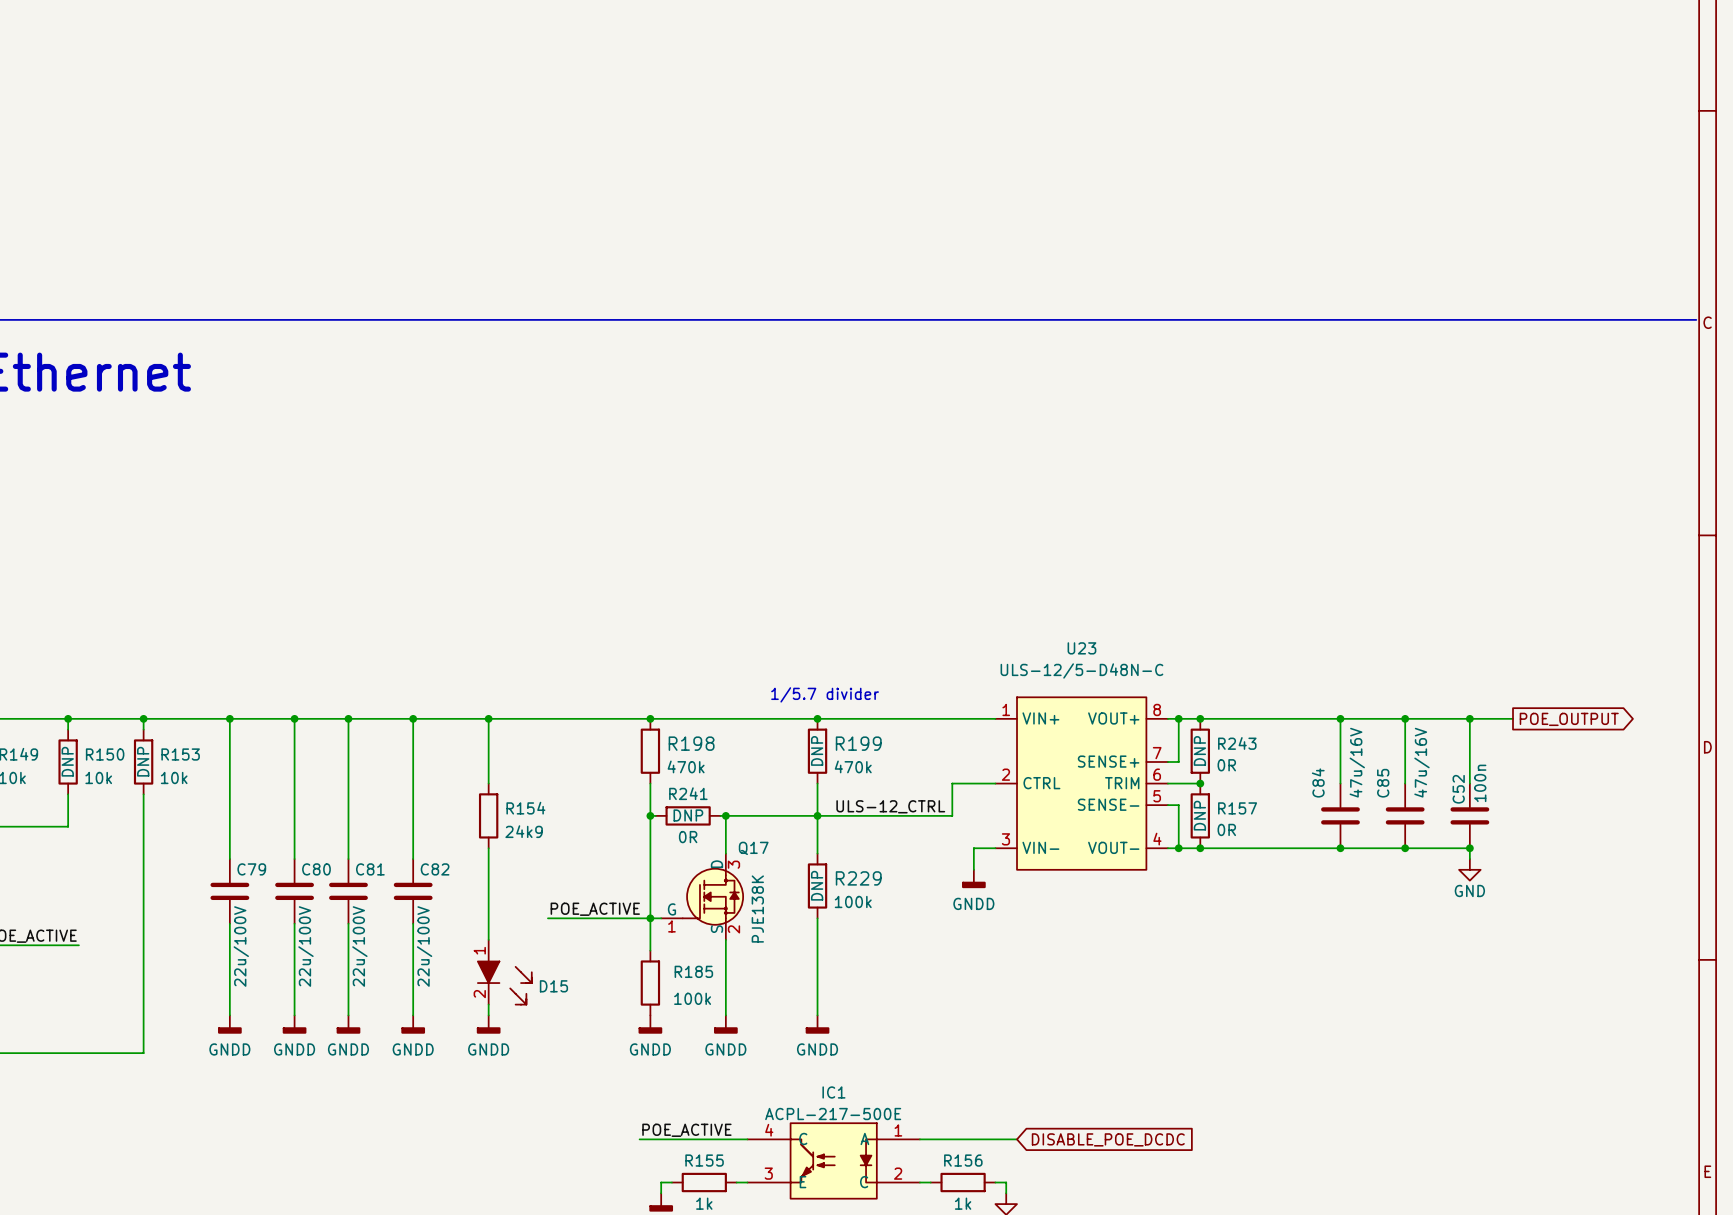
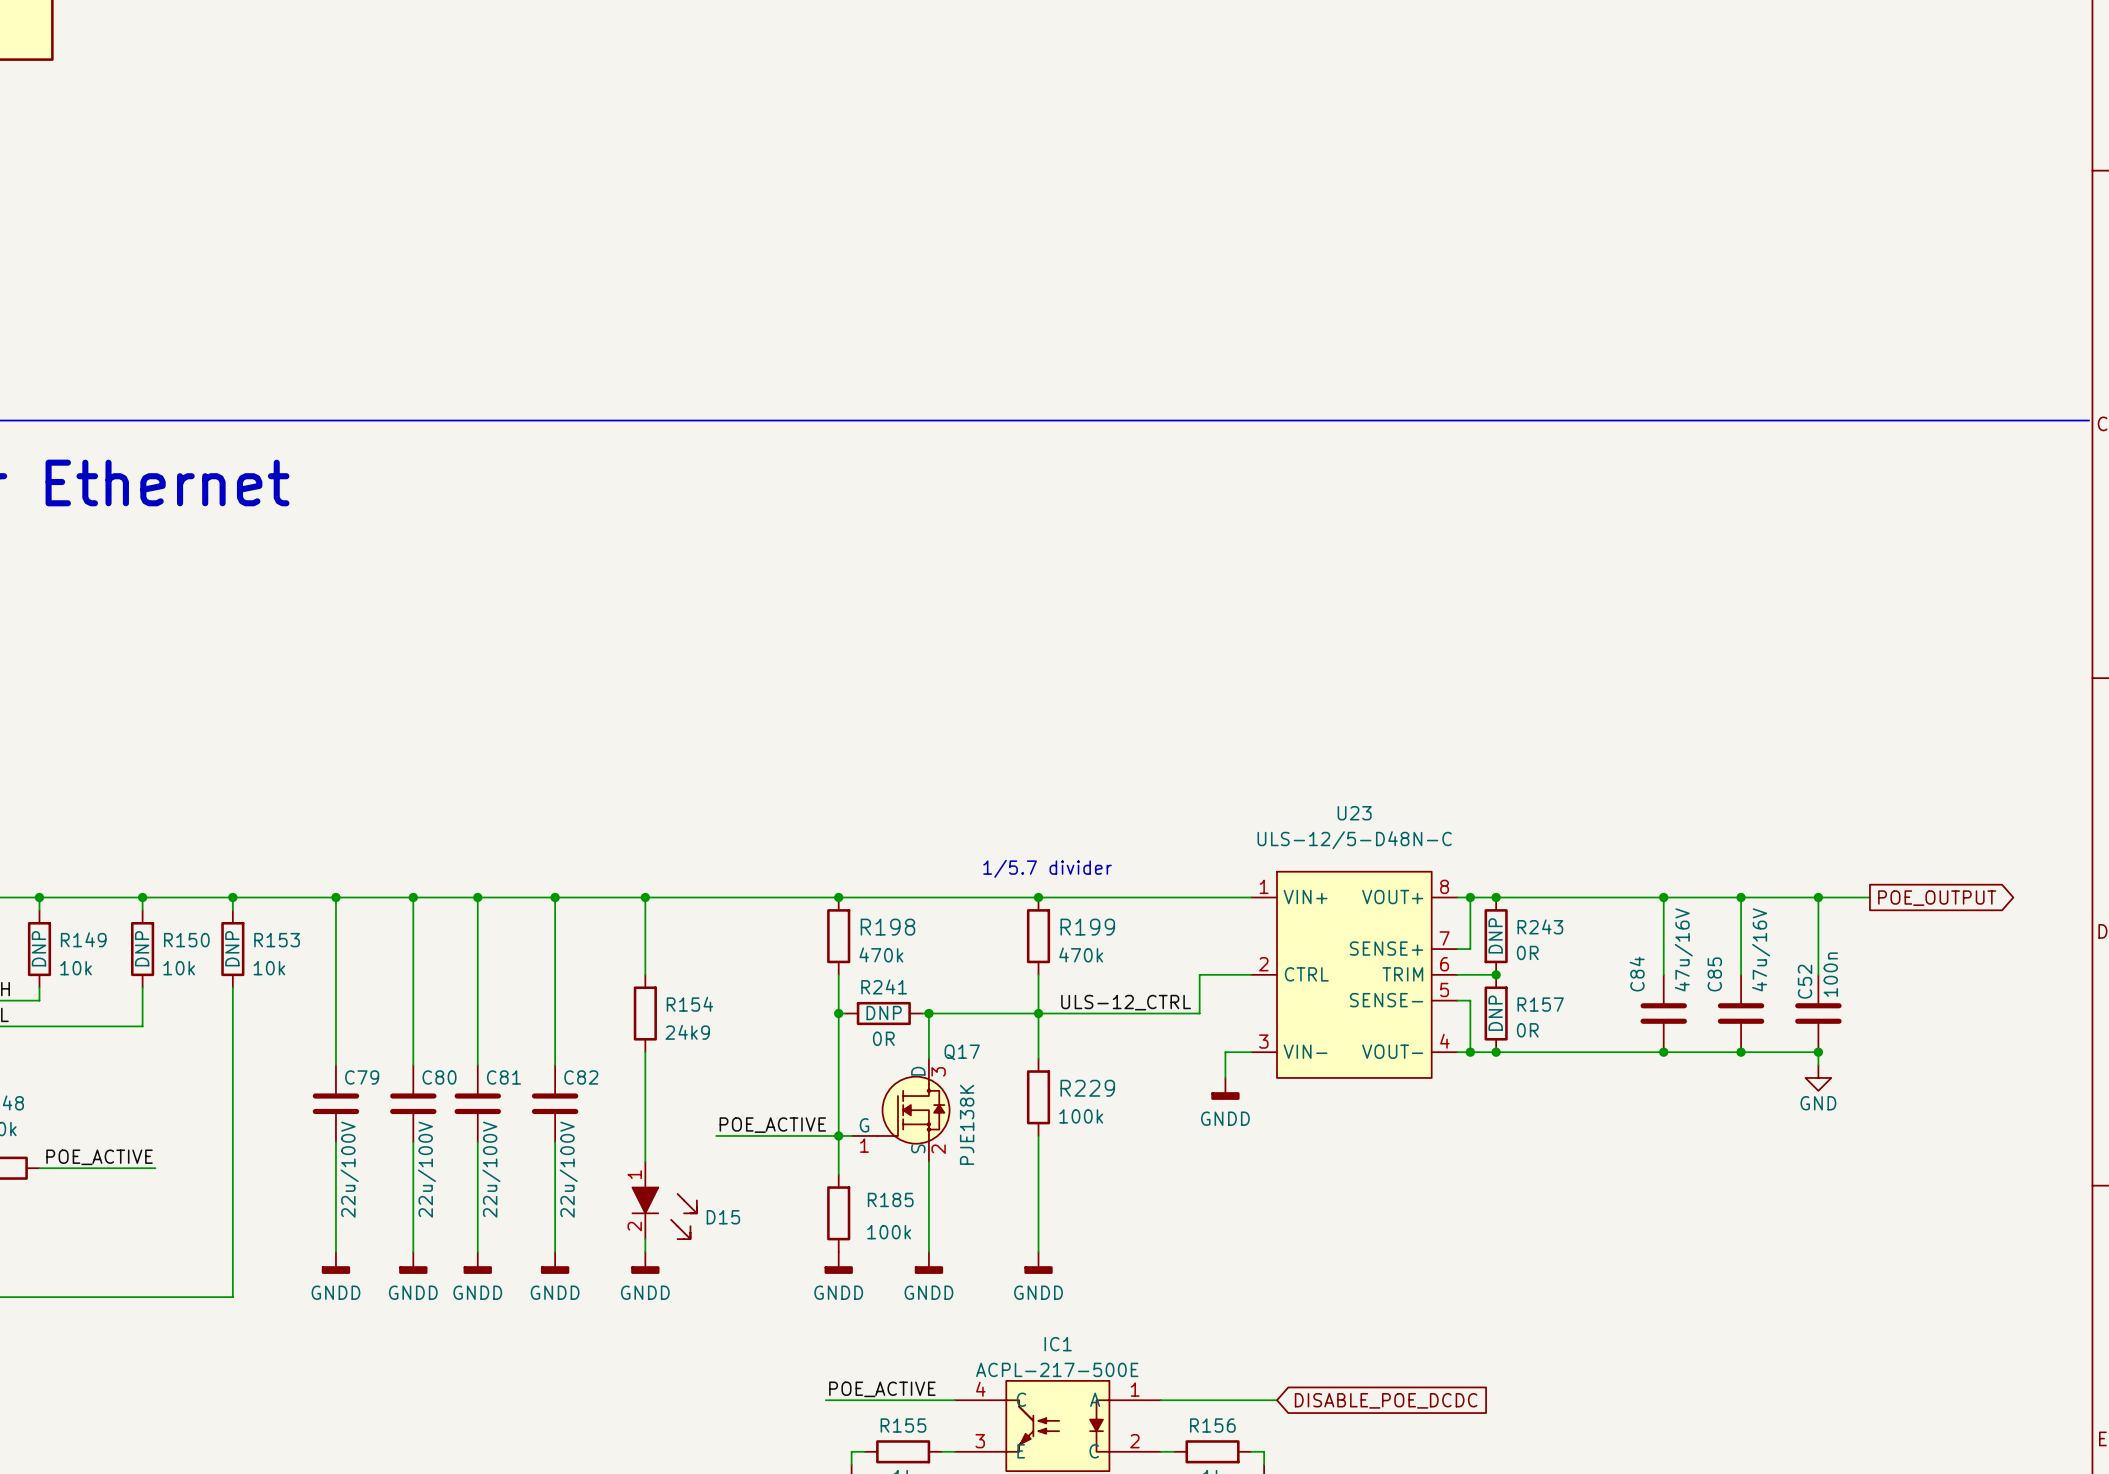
R199 text: DNP (817, 750) -> none
R229 text: DNP (817, 885) -> none

